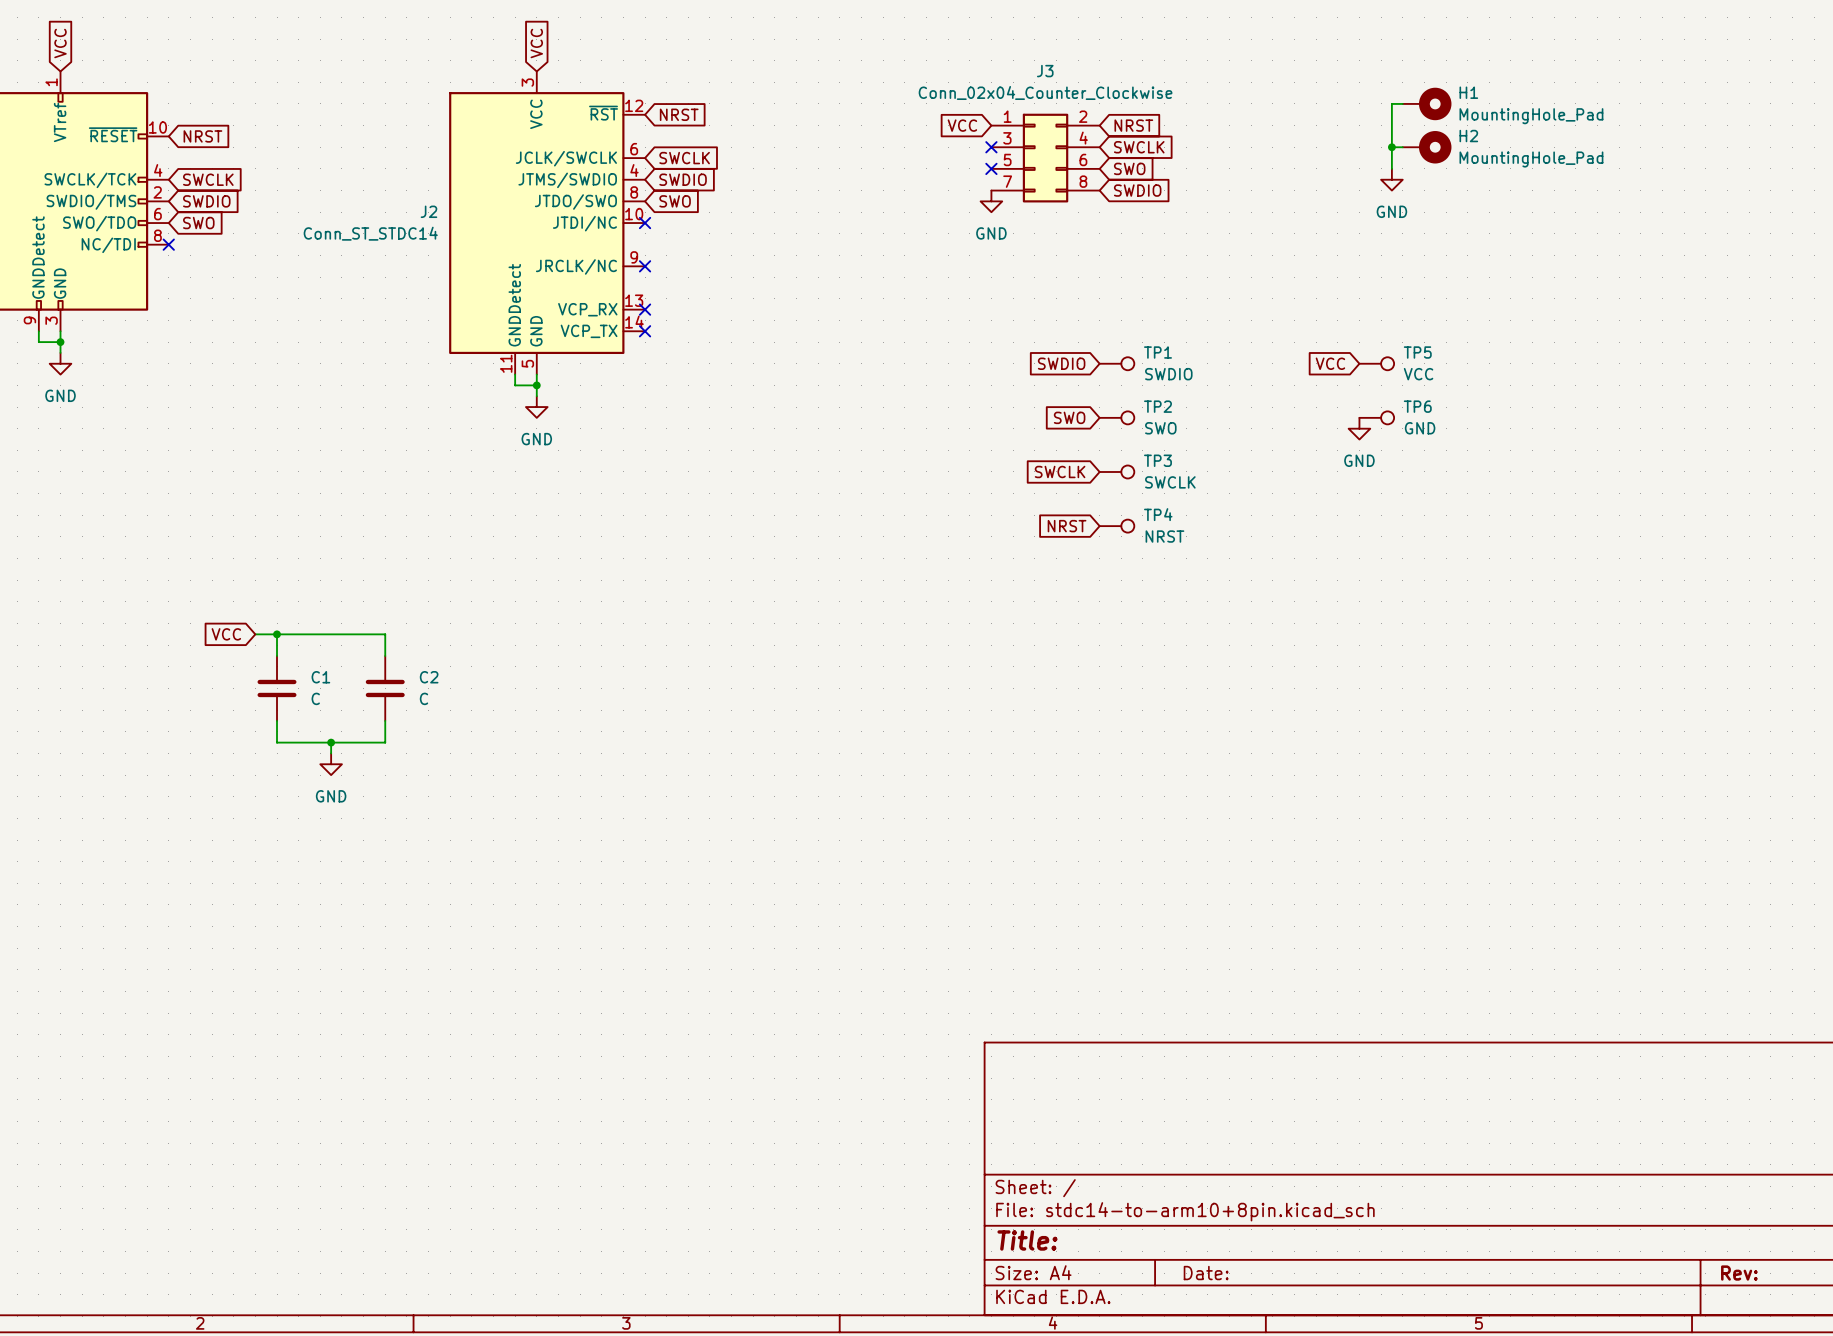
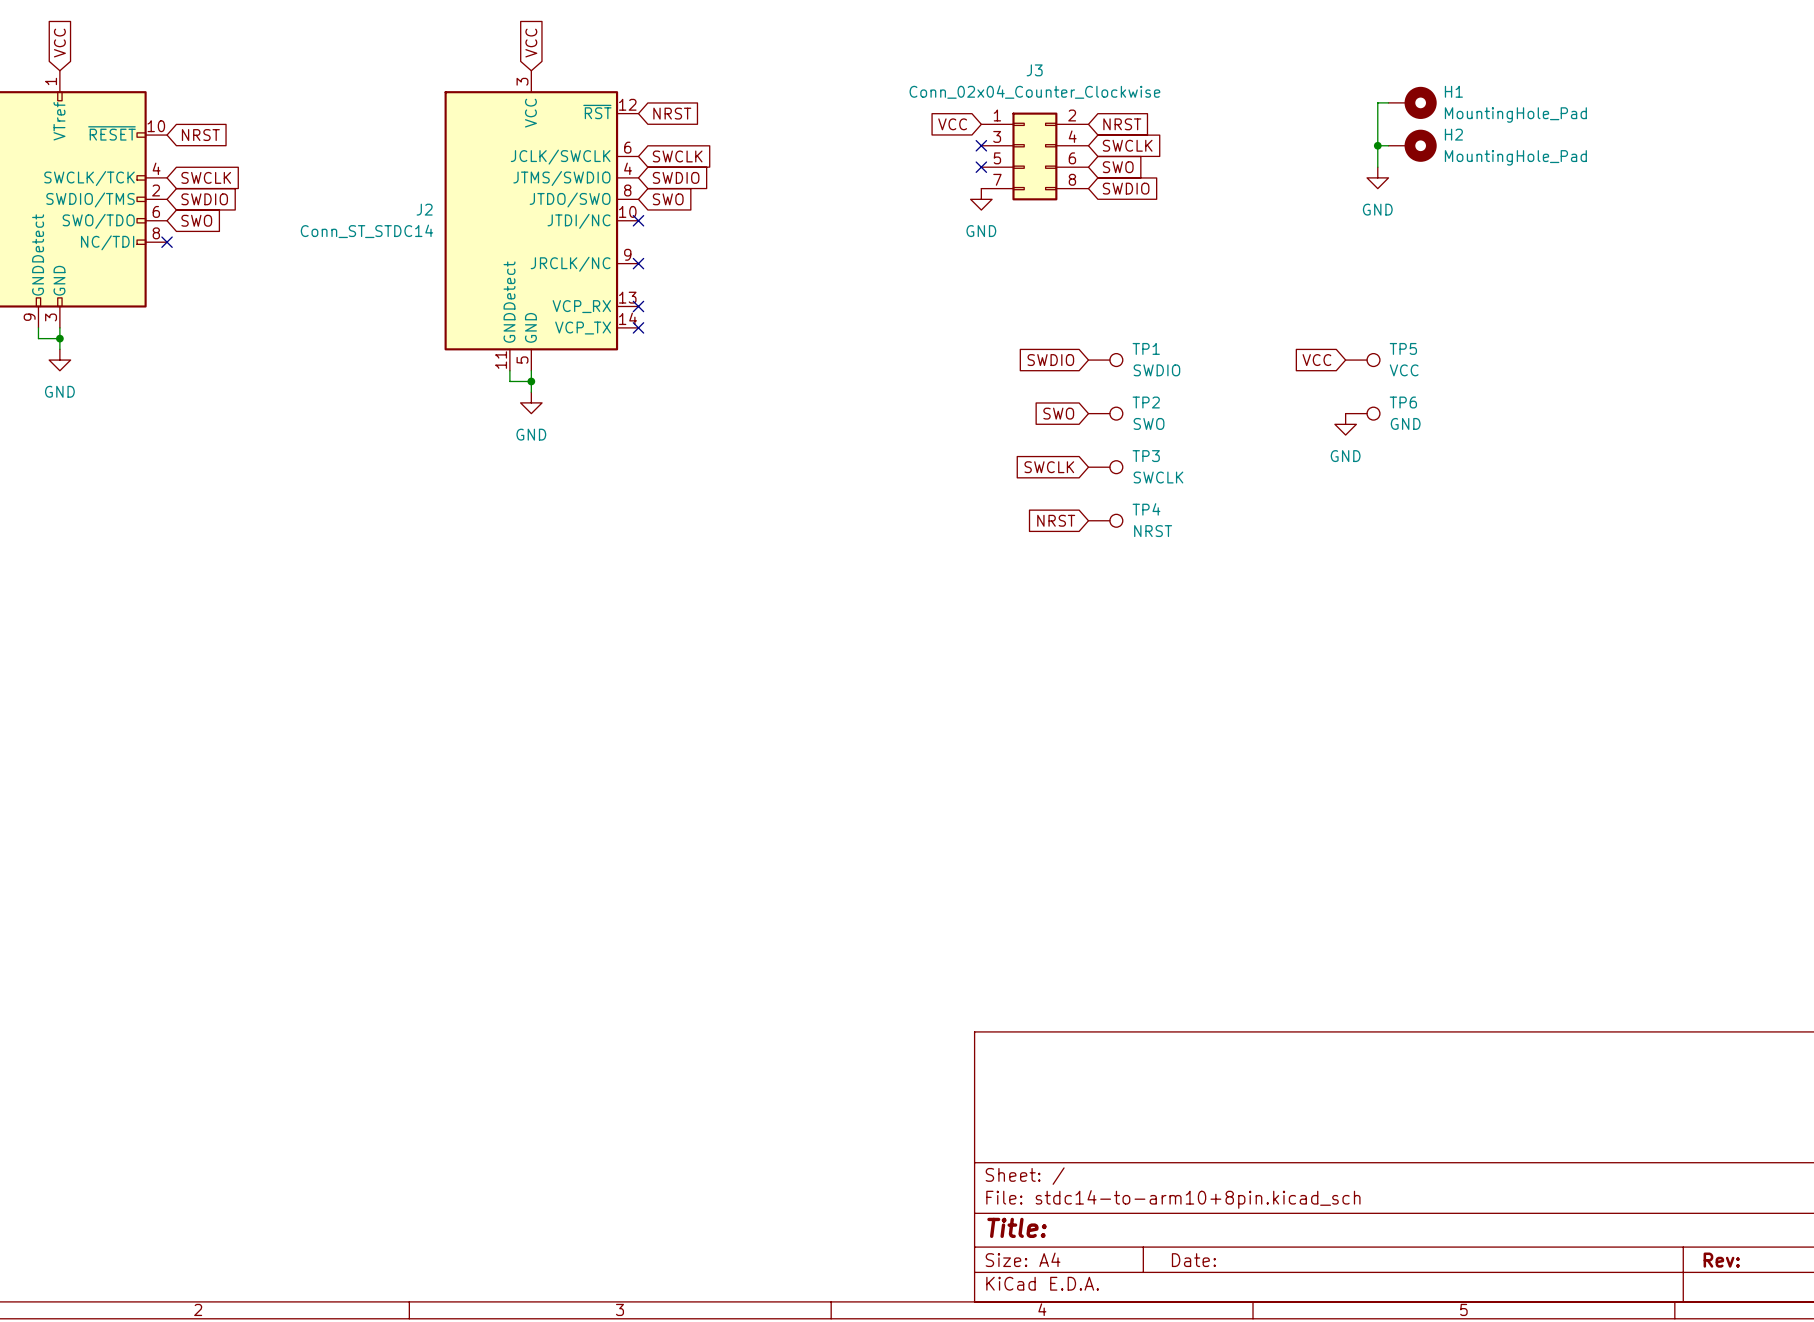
global label: VCC (226, 634) -> none
wire: (255, 634) (385, 634) (385, 656) -> none
wire: (277, 634) (277, 656) -> none
junction: (277, 634) -> none
C1: C (277, 688) -> none
C2: C (385, 688) -> none
wire: (277, 720) (277, 742) (385, 742) (385, 720) -> none
wire: (331, 742) (331, 753) -> none
junction: (331, 742) -> none
power symbol: GND (331, 764) -> none

